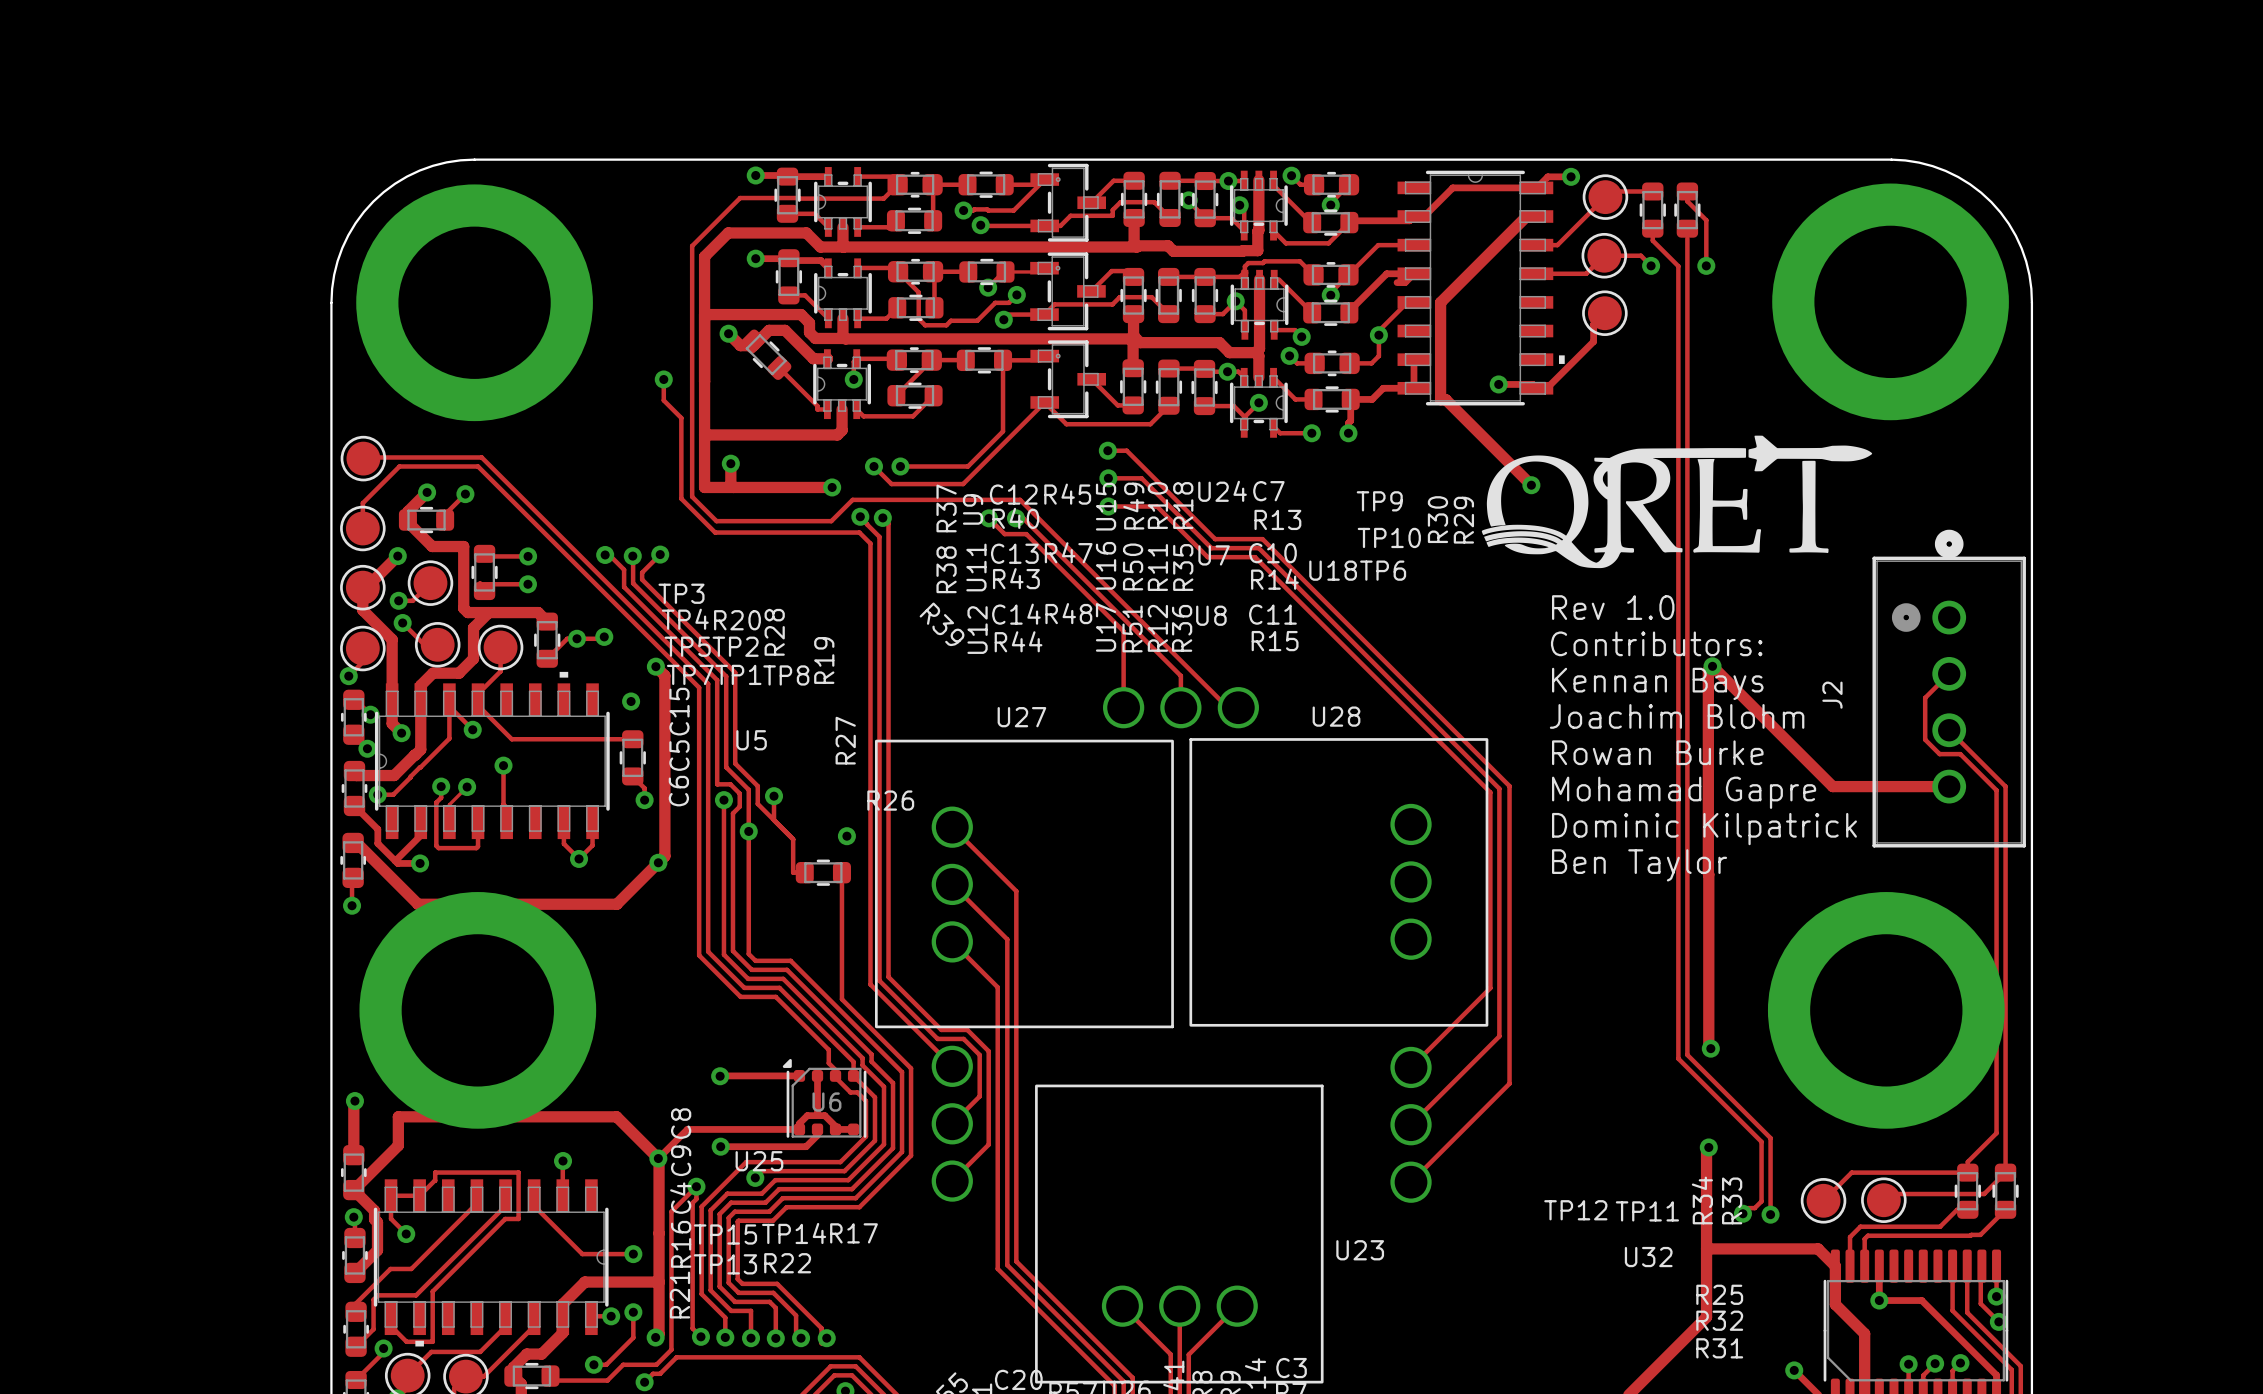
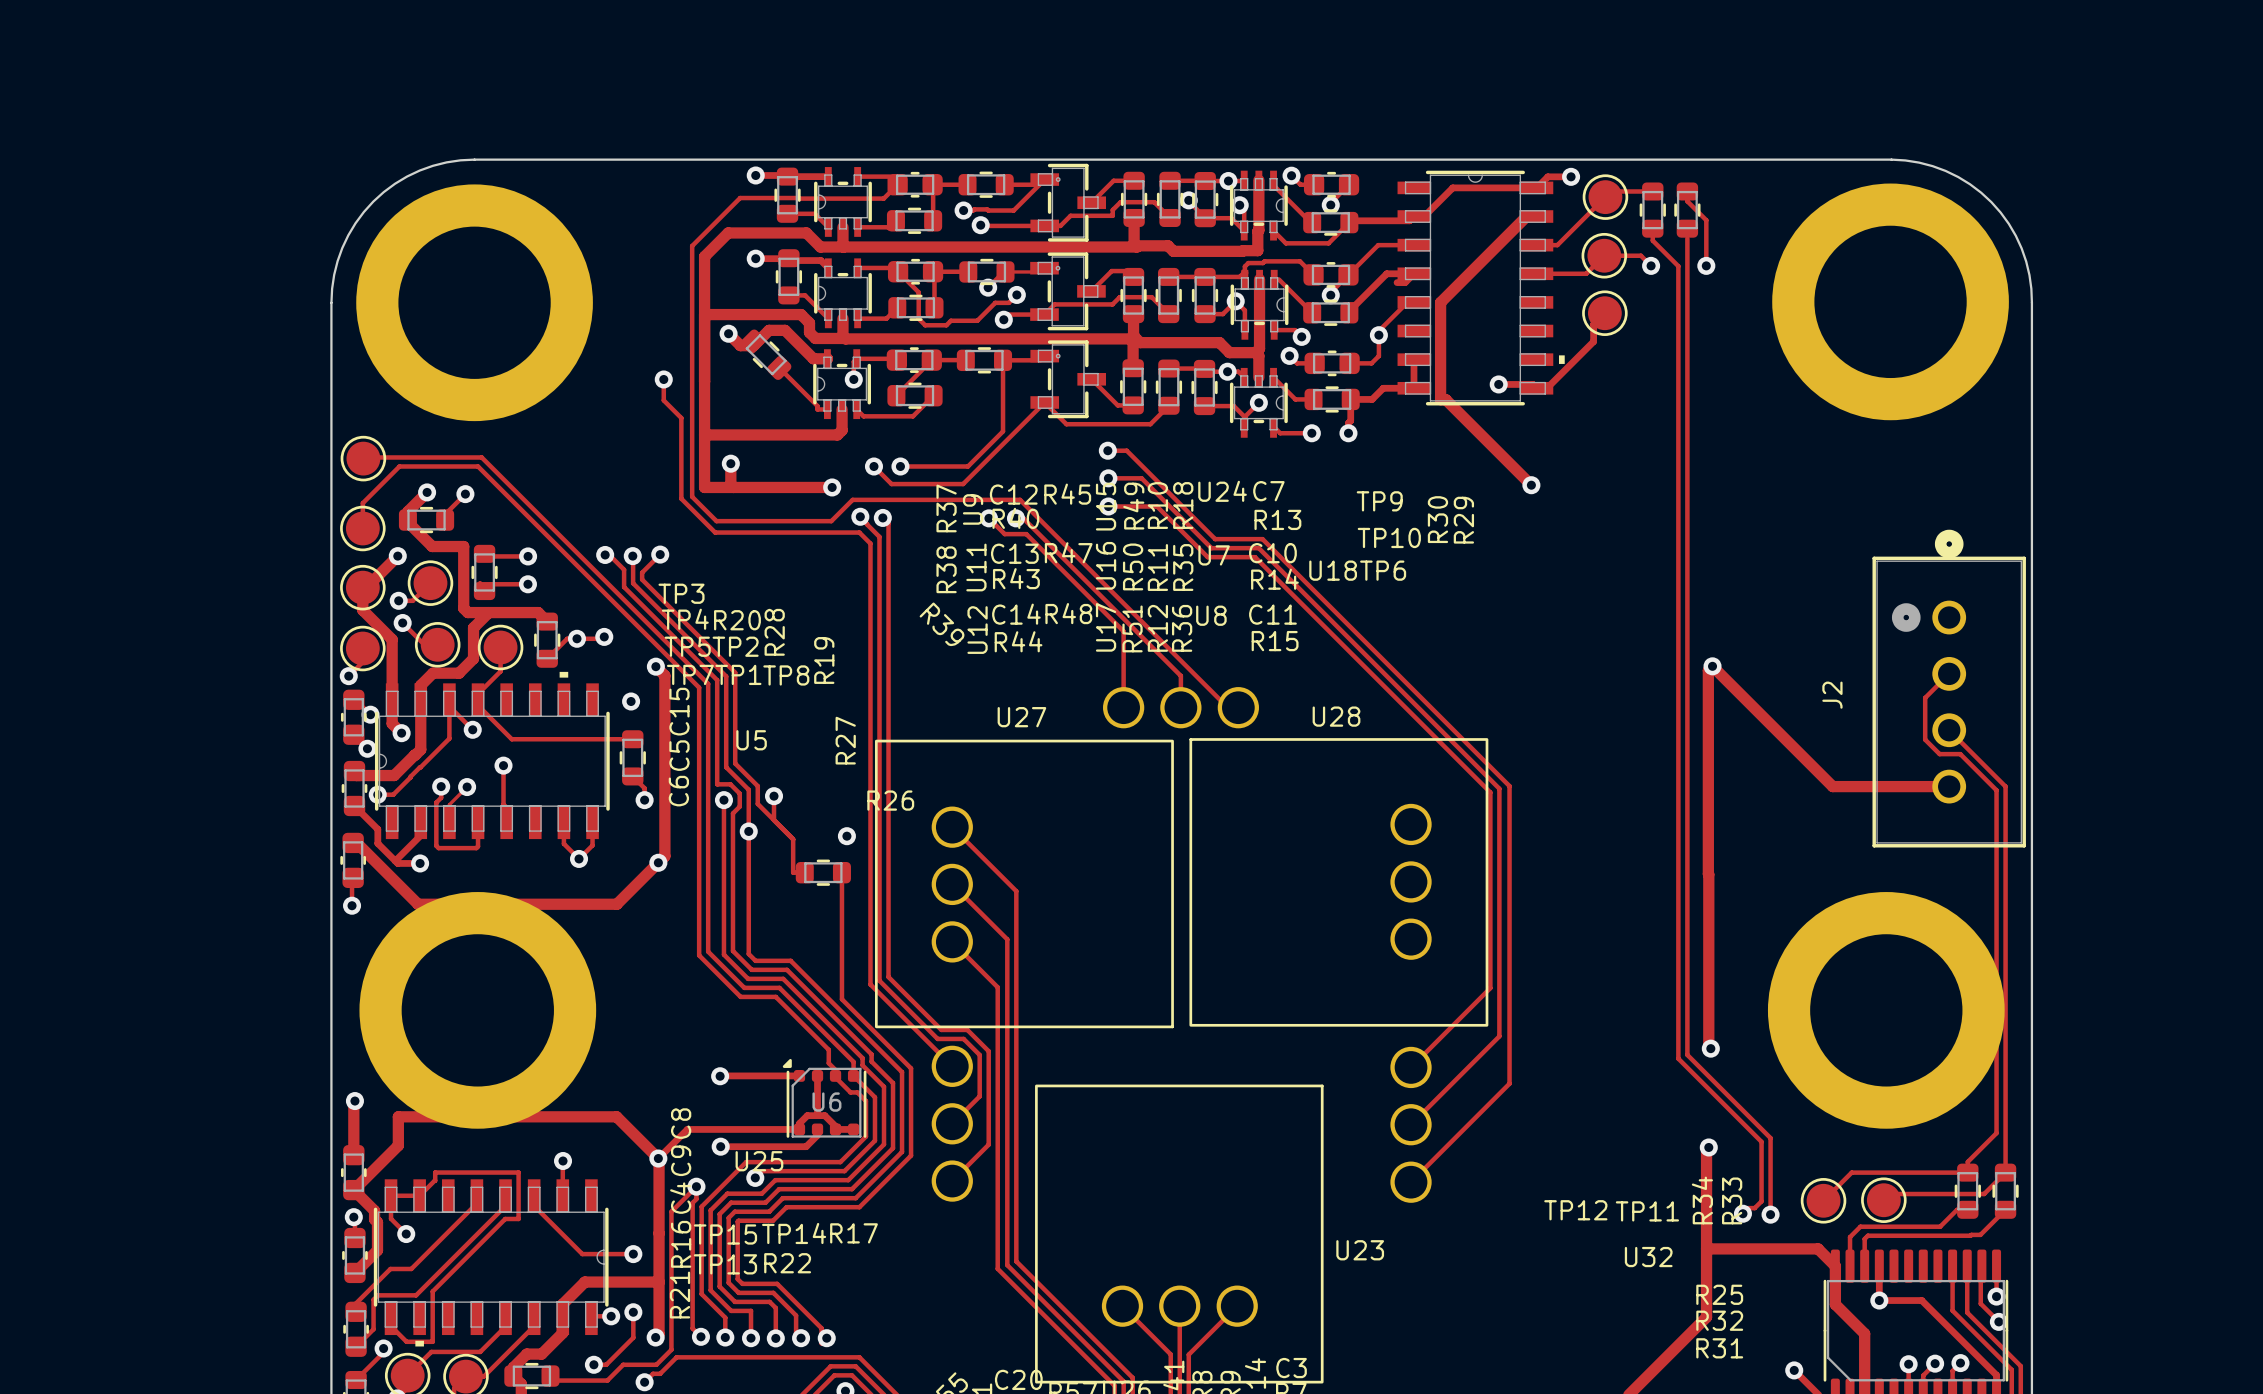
drawing: [1481, 435, 1873, 569] -> none
text: Rev 1.0 (1613, 607) -> none
text: Contributors: (1656, 643) -> none
text: Kennan Bays (1657, 683) -> none
text: Joachim Blohm (1677, 716) -> none
text: Rowan Burke (1657, 752) -> none
text: Mohamad Gapre (1684, 792) -> none
text: Dominic Kilpatrick (1704, 829) -> none
text: Ben Taylor (1639, 865) -> none

